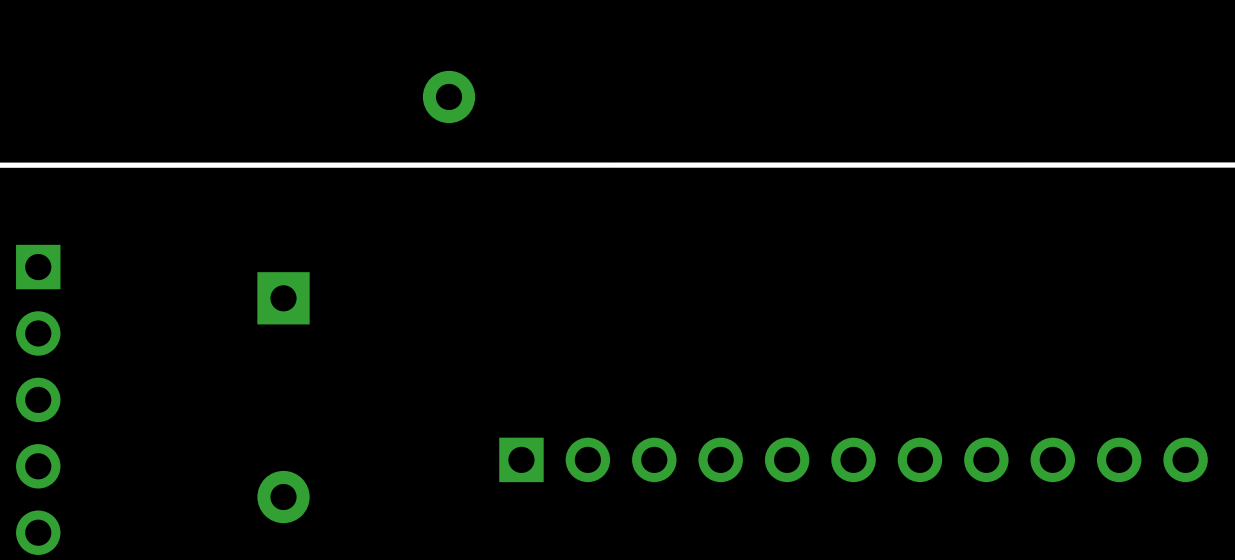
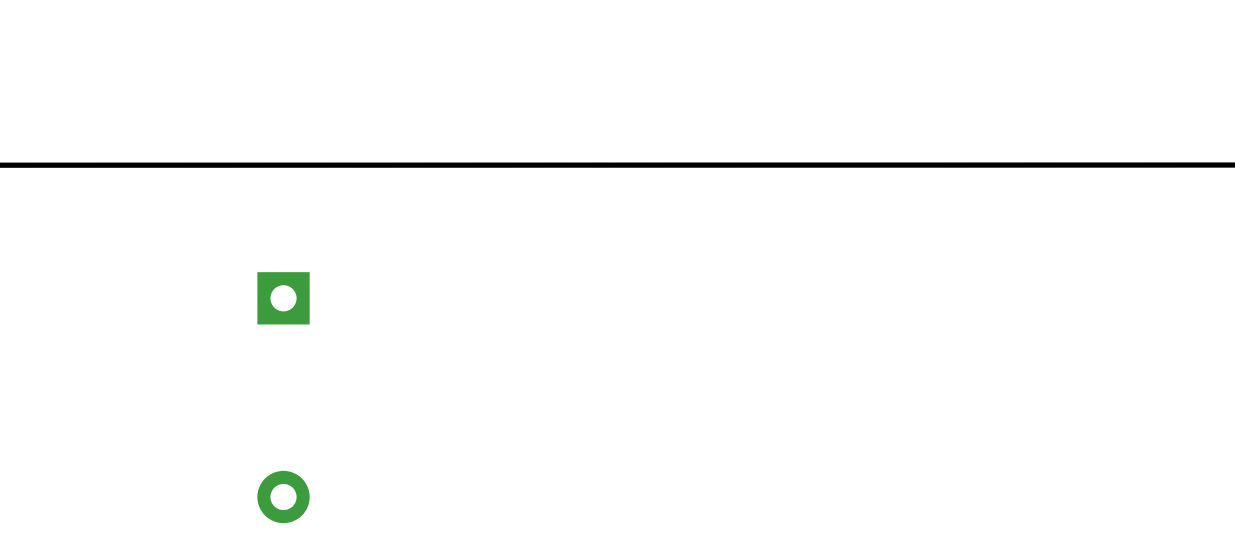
part: (449, 96) -> none
part: (38, 399) -> none
part: (853, 459) -> none

